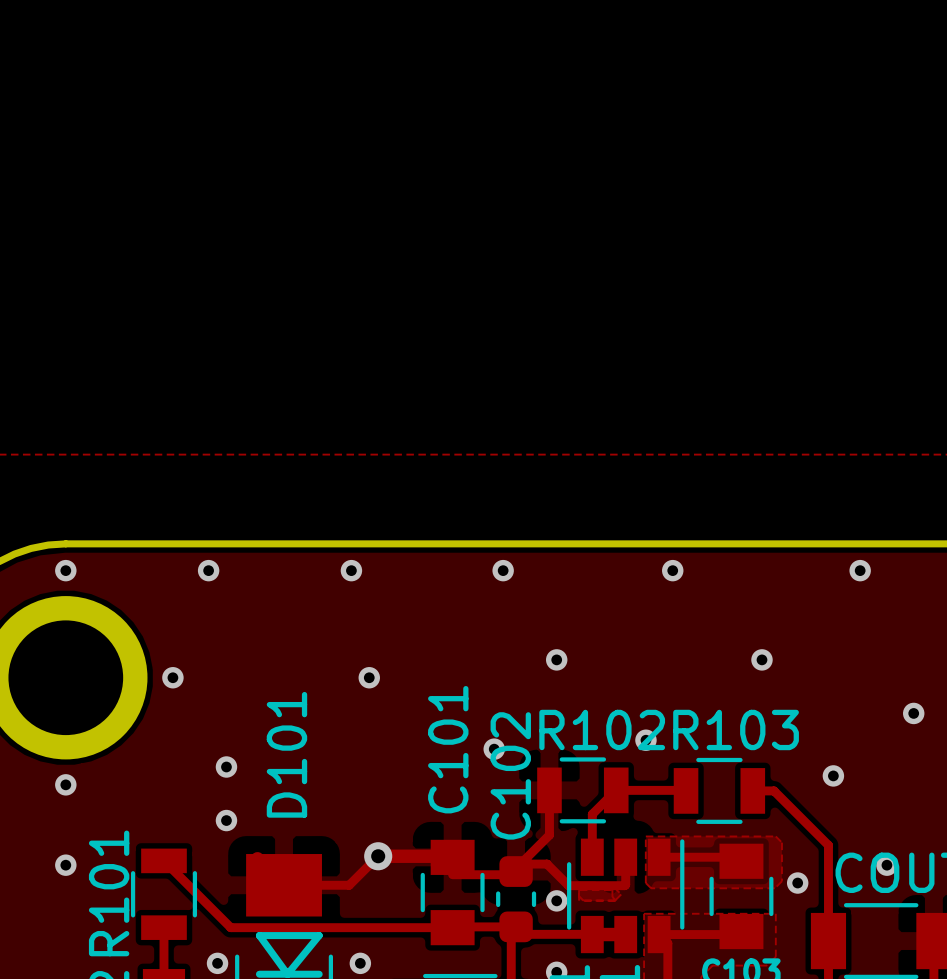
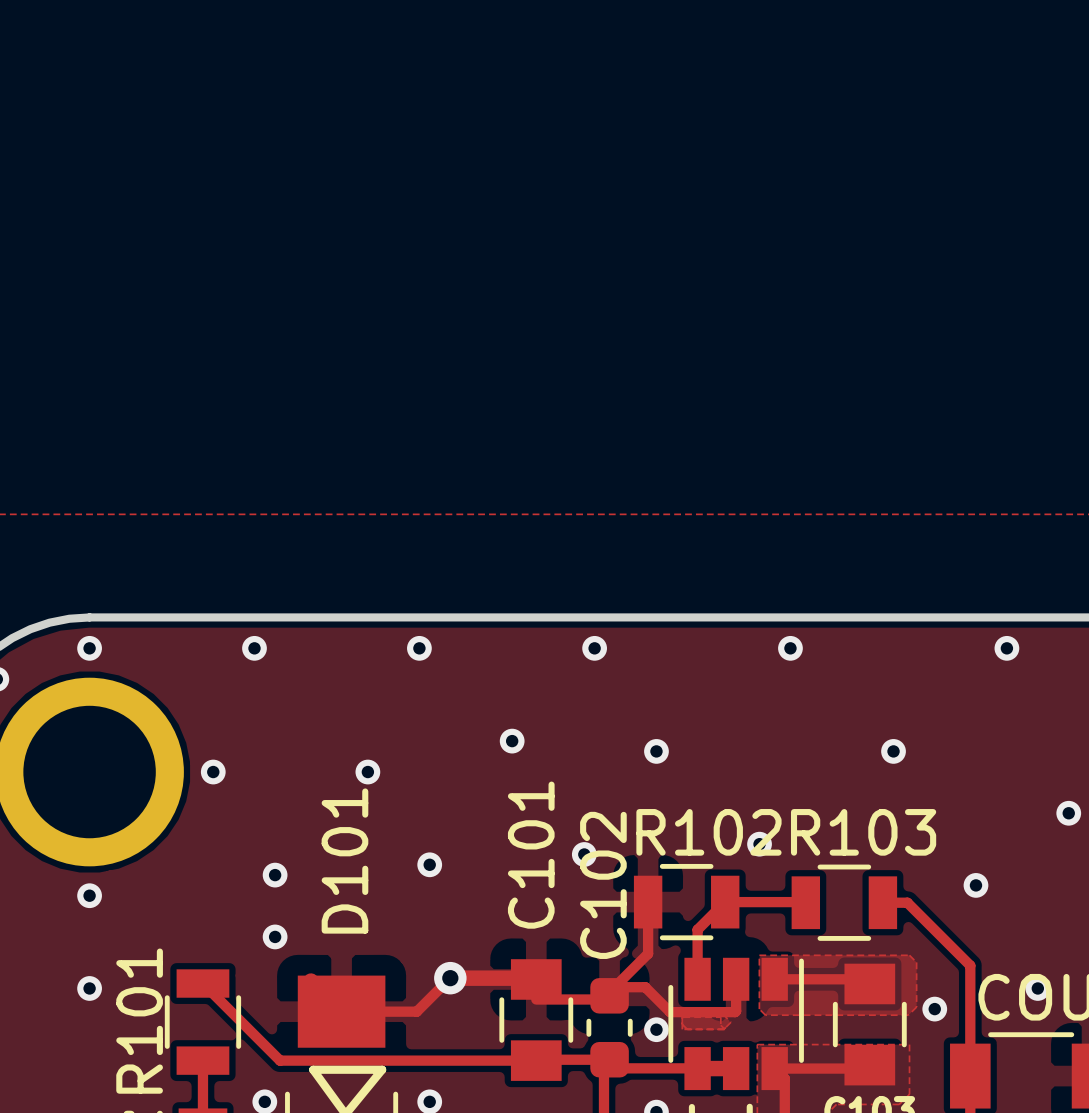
via: none -> (512, 741)
via: none -> (367, 772)
via: (369, 677) -> none
via: none -> (429, 864)

